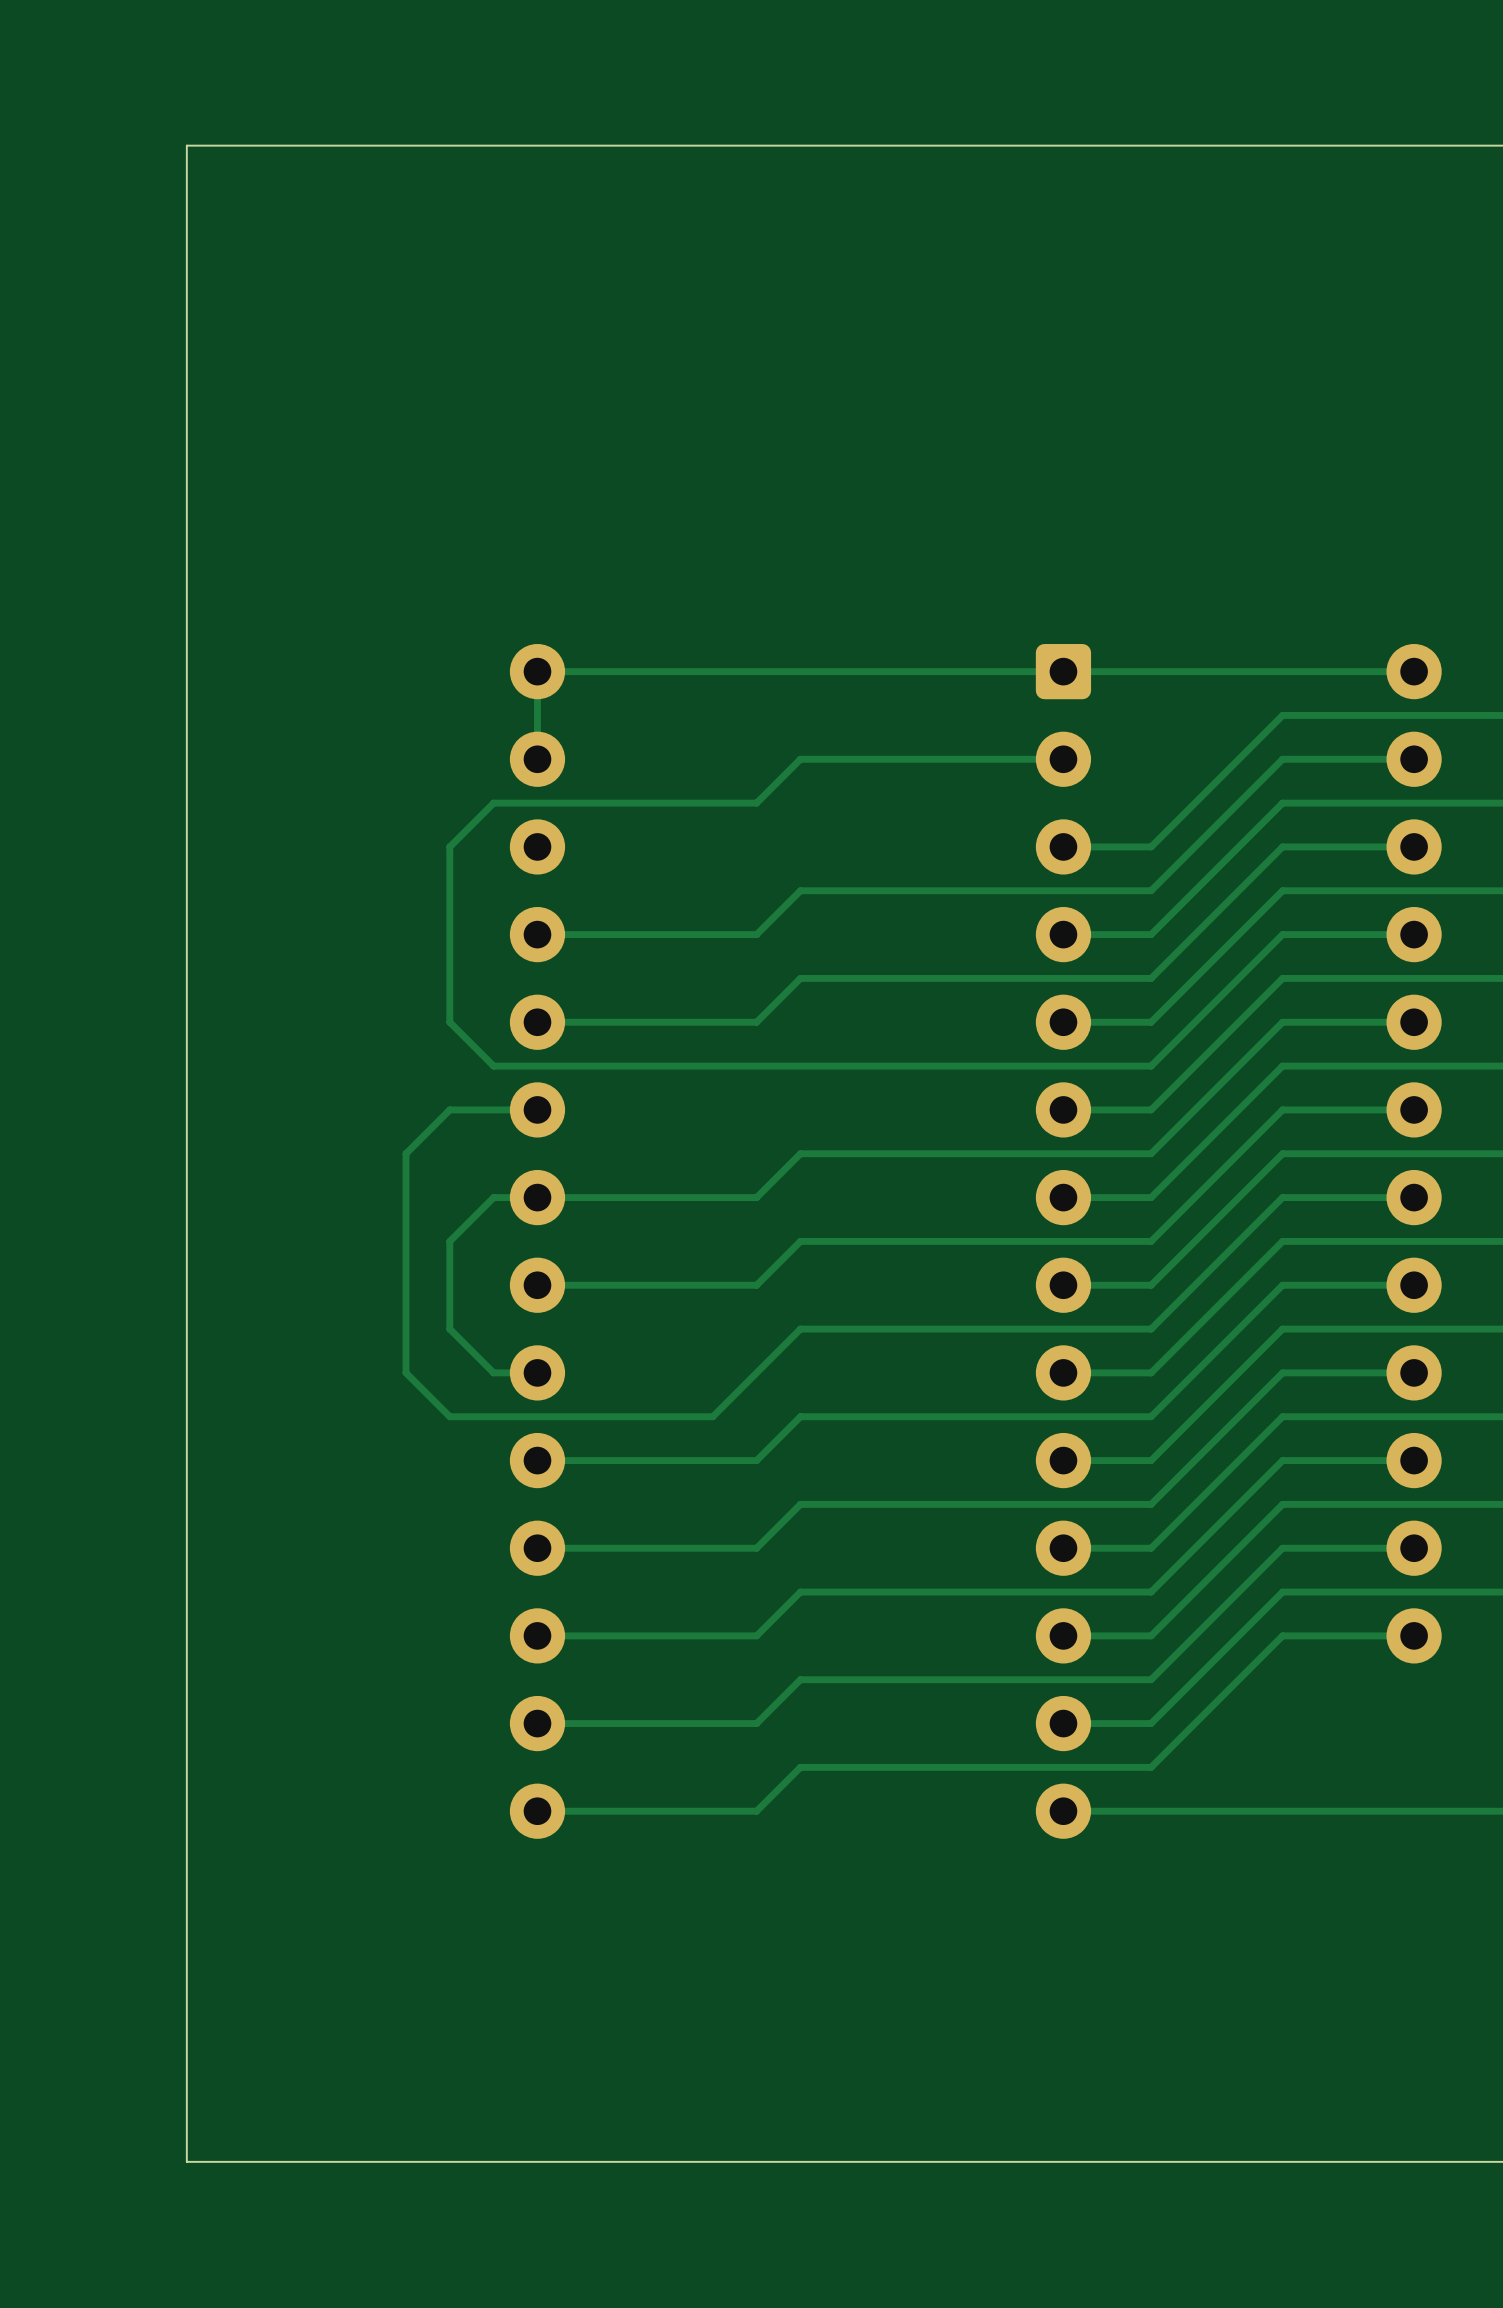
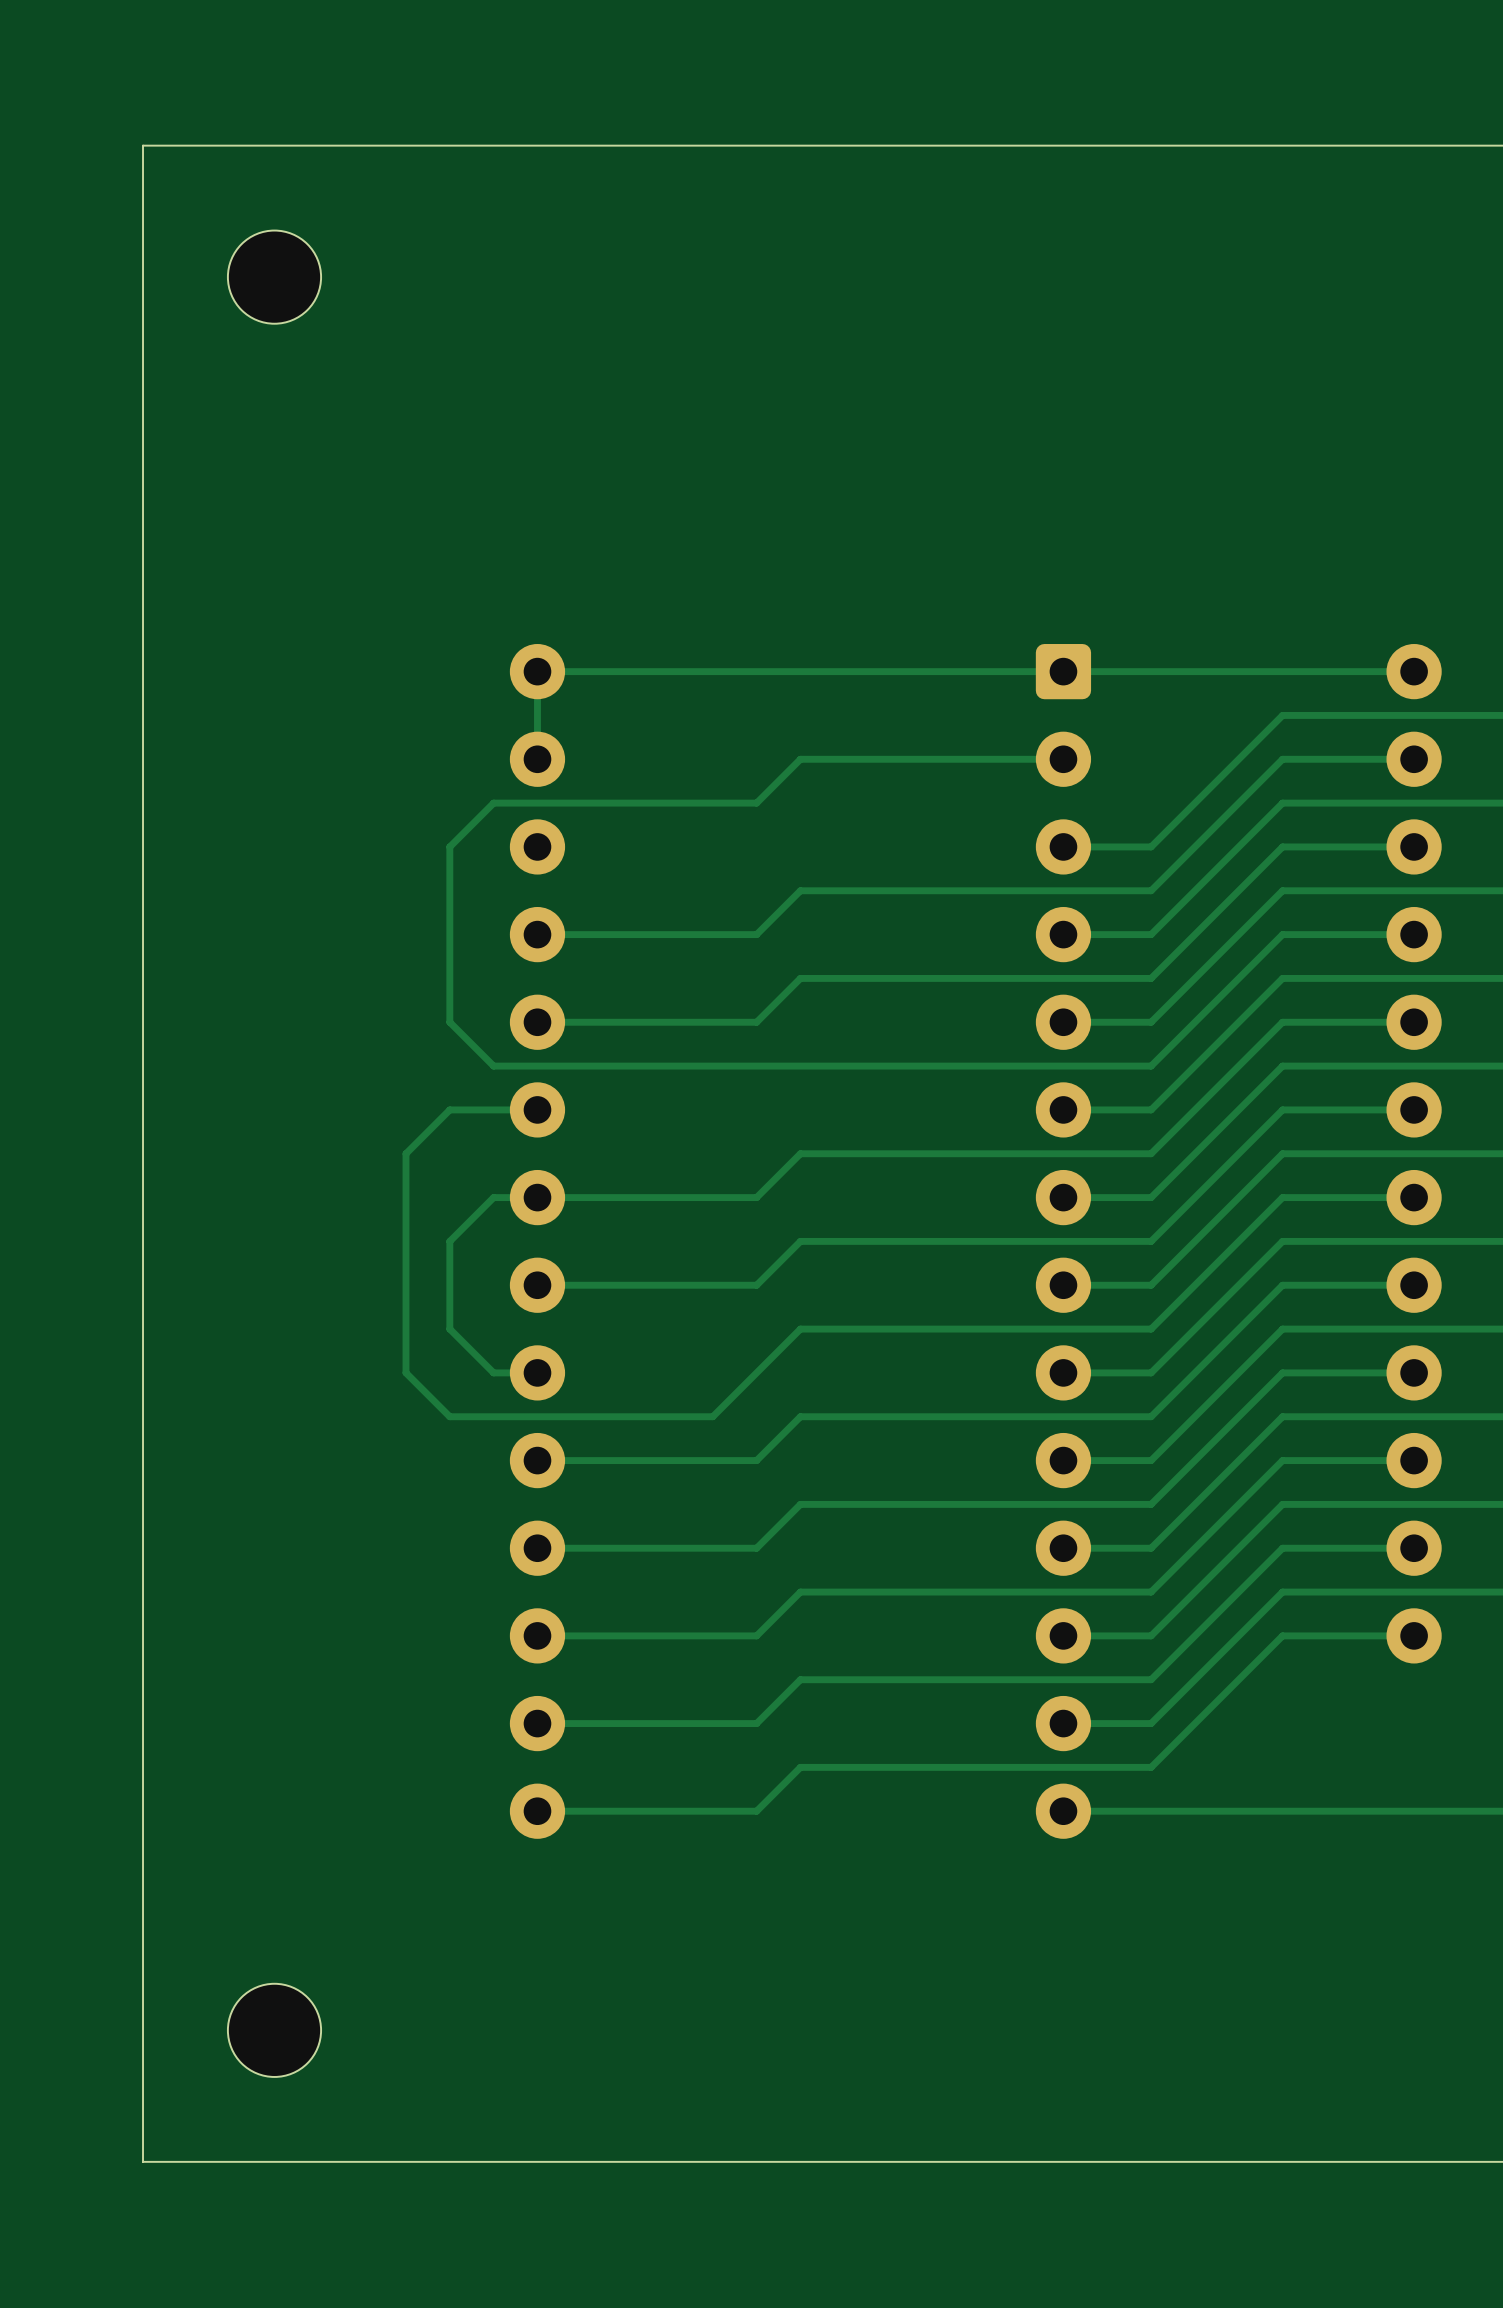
board edge: (186, 145) (186, 2161) -> (186, 145) (143, 145) (143, 2161) (186, 2161)
part: none -> (274, 277)
part: none -> (274, 2030)

